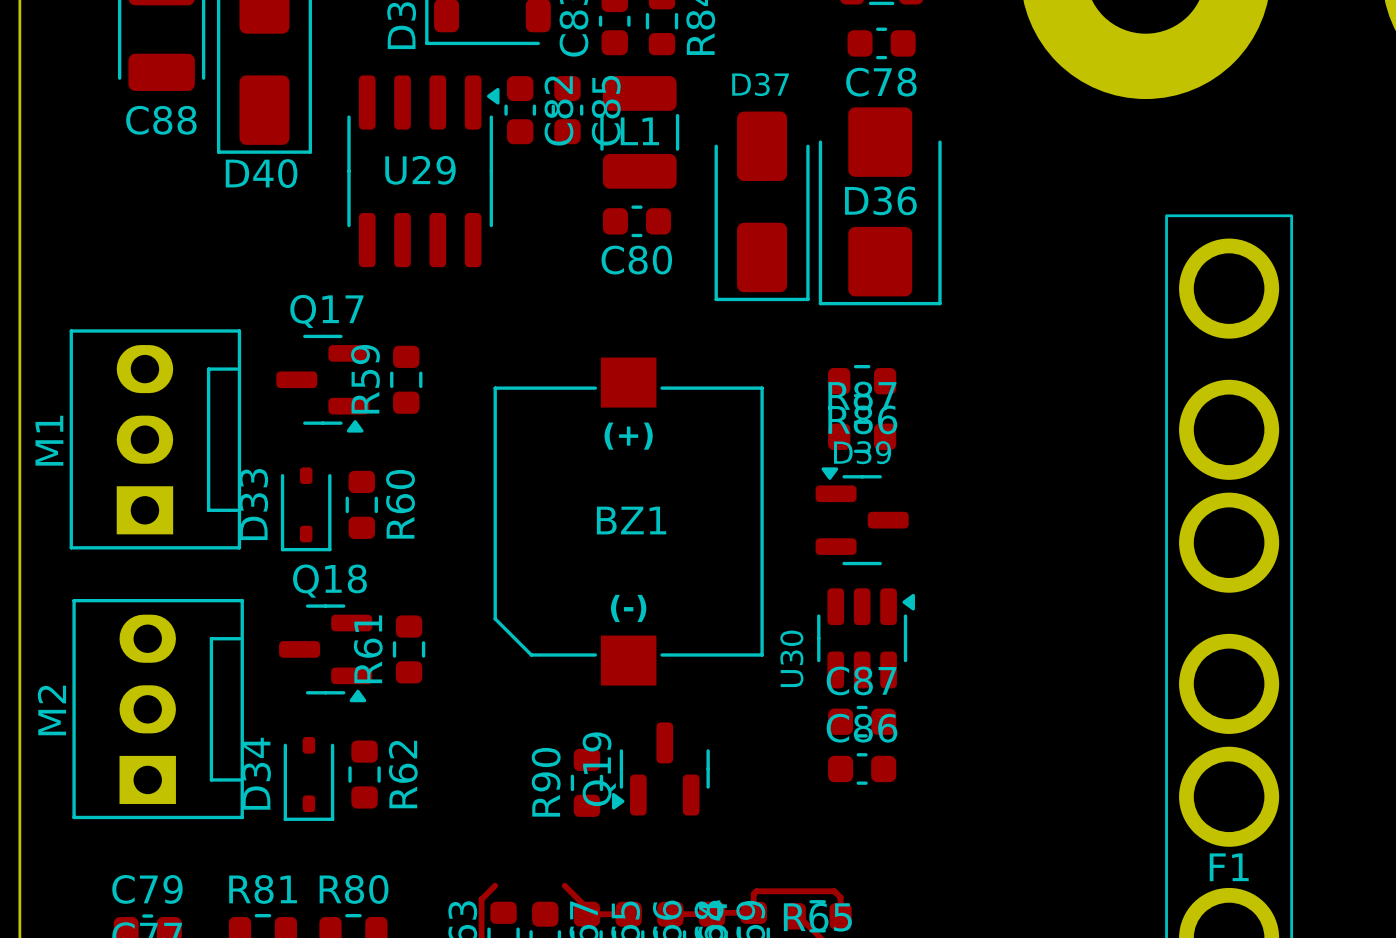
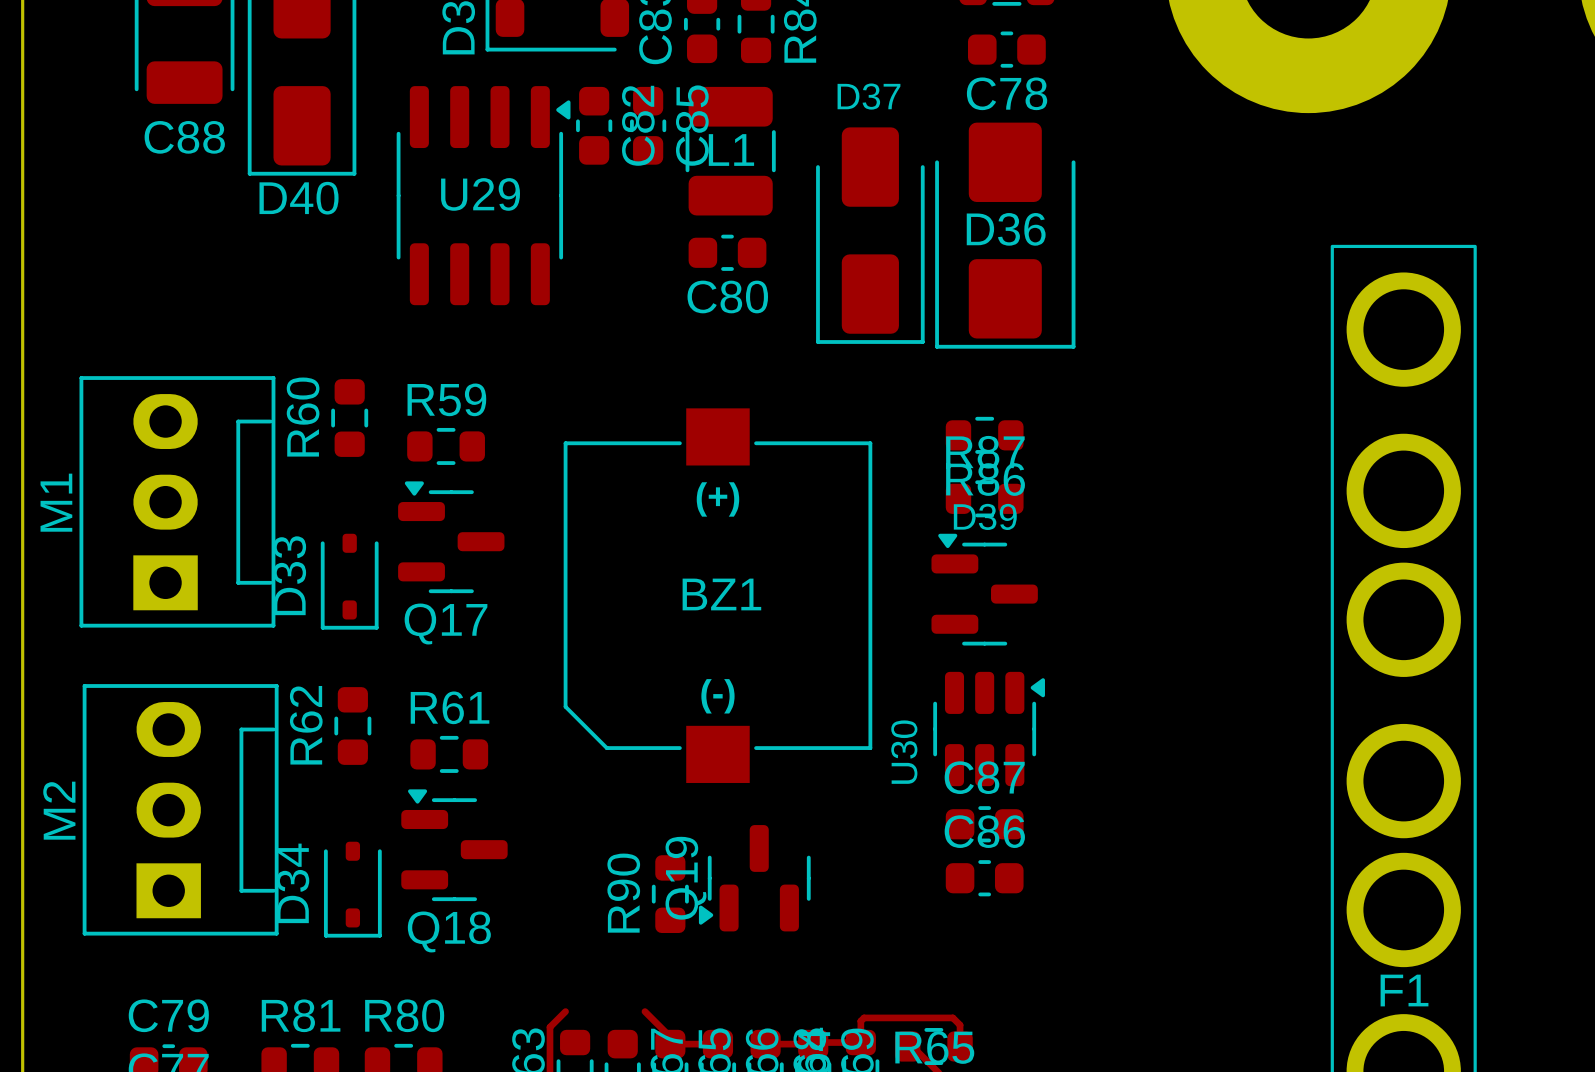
R59 rotation: 0° (406, 379) -> 90° clockwise (446, 446)
Q17 rotation: 0° (322, 383) -> 180° (451, 537)
Q17 position: (322, 383) -> (451, 537)
R60 position: (361, 504) -> (349, 418)
R60 name position: R60 (400, 504) -> R60 (303, 417)
R61 rotation: 0° (409, 649) -> 90° clockwise (449, 754)
Q18 rotation: 0° (325, 653) -> 180° (454, 845)
Q18 position: (325, 653) -> (454, 845)
R62 position: (364, 774) -> (352, 726)
R62 name position: R62 (403, 774) -> R62 (306, 725)

